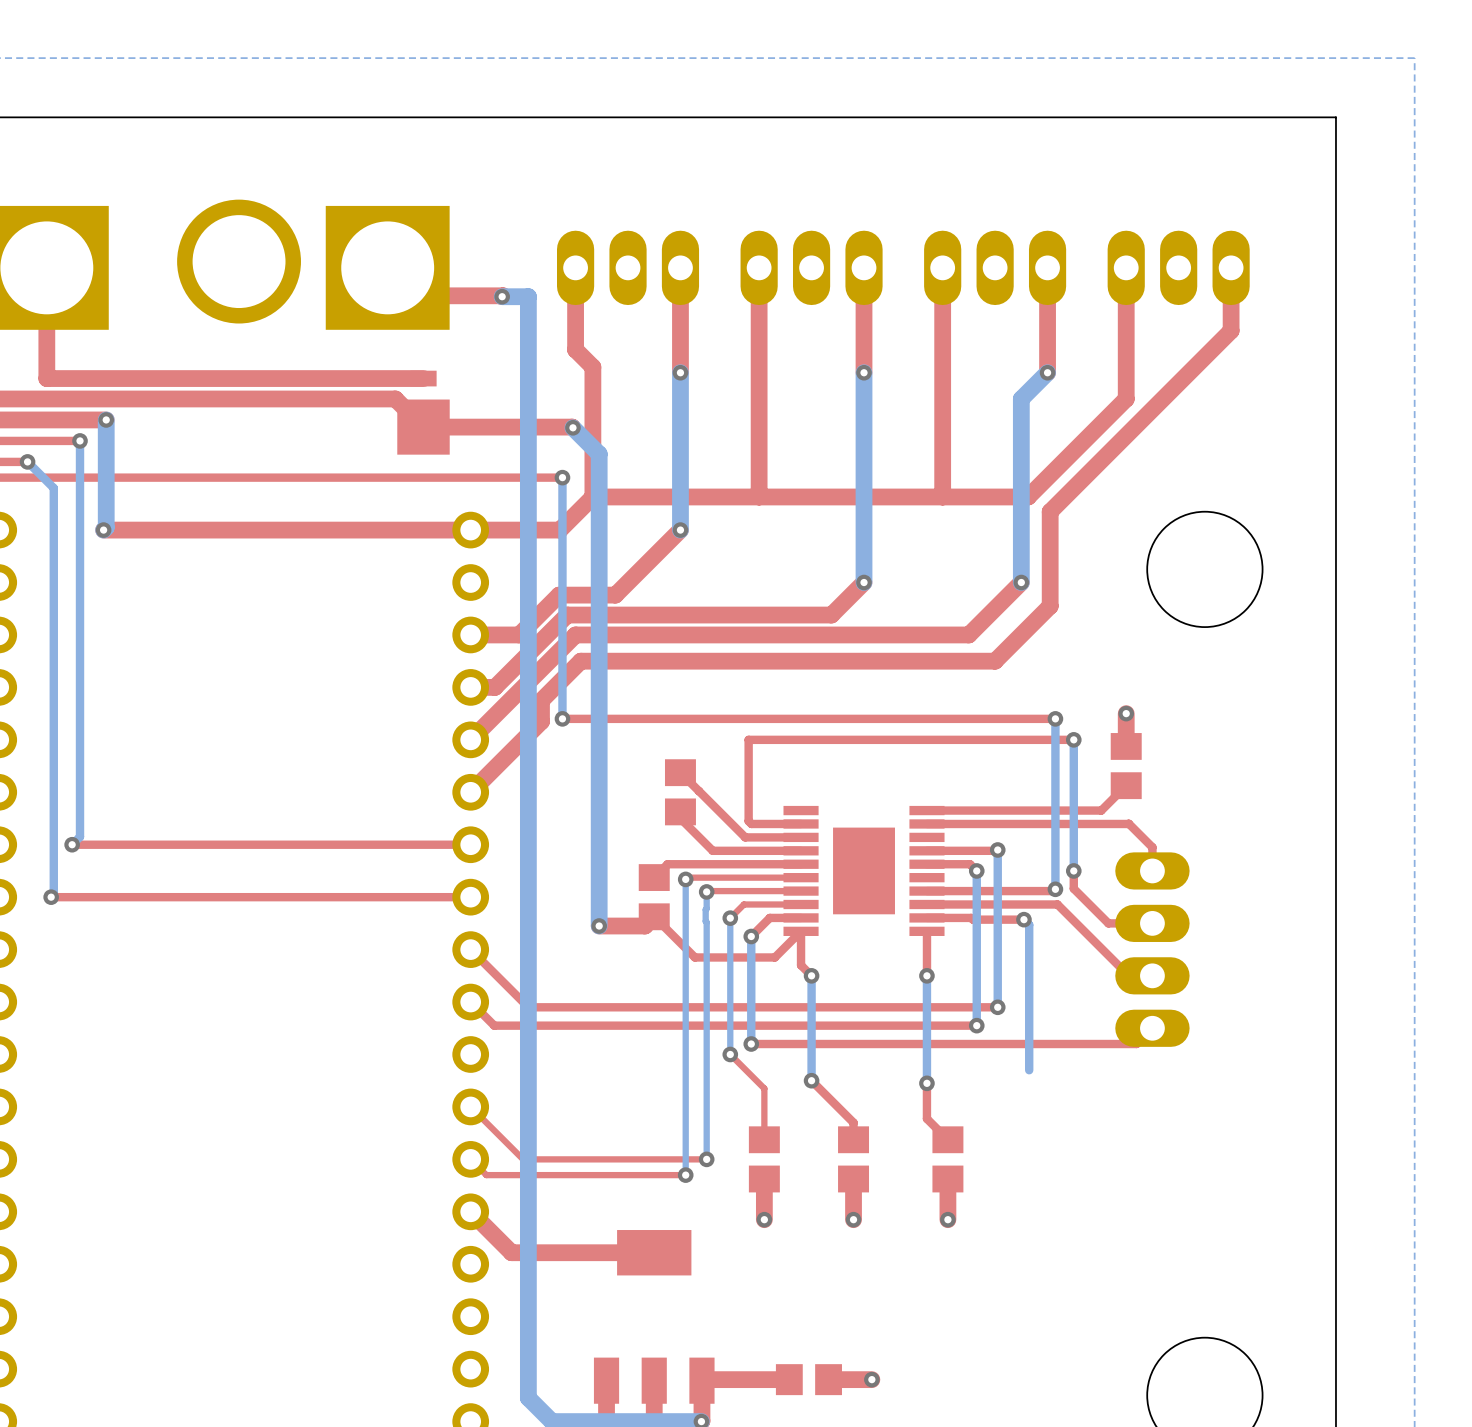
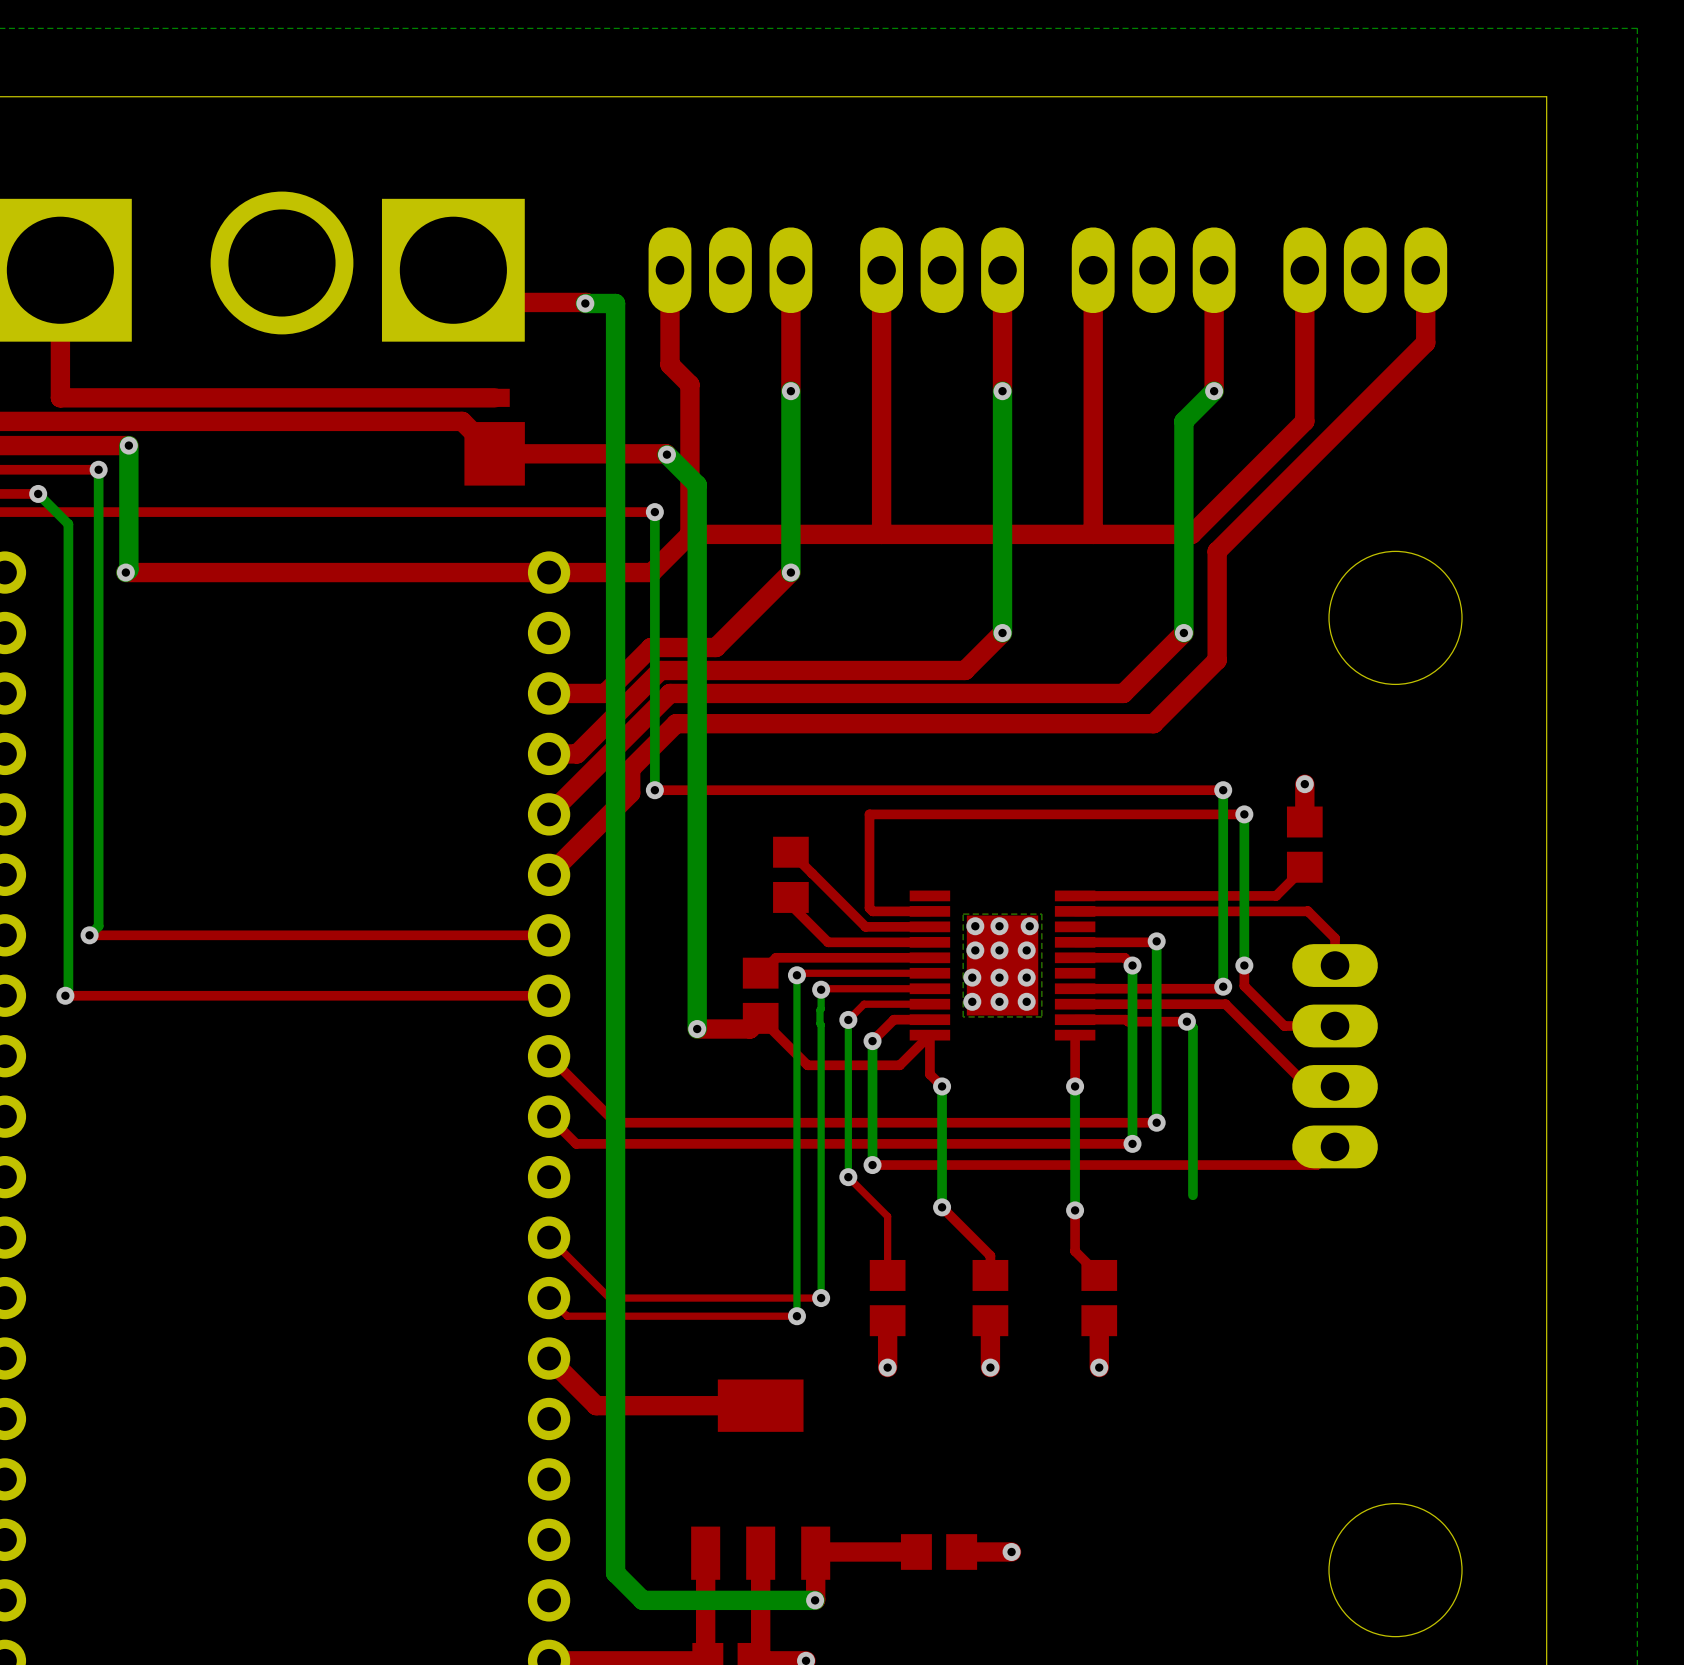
bottom zone outline: none -> (1041, 914) (1041, 1016) (963, 1016) (963, 914) (1041, 914)
via: none -> (975, 926)
via: none -> (999, 926)
via: none -> (1029, 926)
via: none -> (975, 950)
via: none -> (999, 950)
via: none -> (1026, 950)
via: none -> (972, 977)
via: none -> (999, 977)
via: none -> (1026, 977)
via: none -> (972, 1001)
via: none -> (999, 1001)
via: none -> (1026, 1001)

